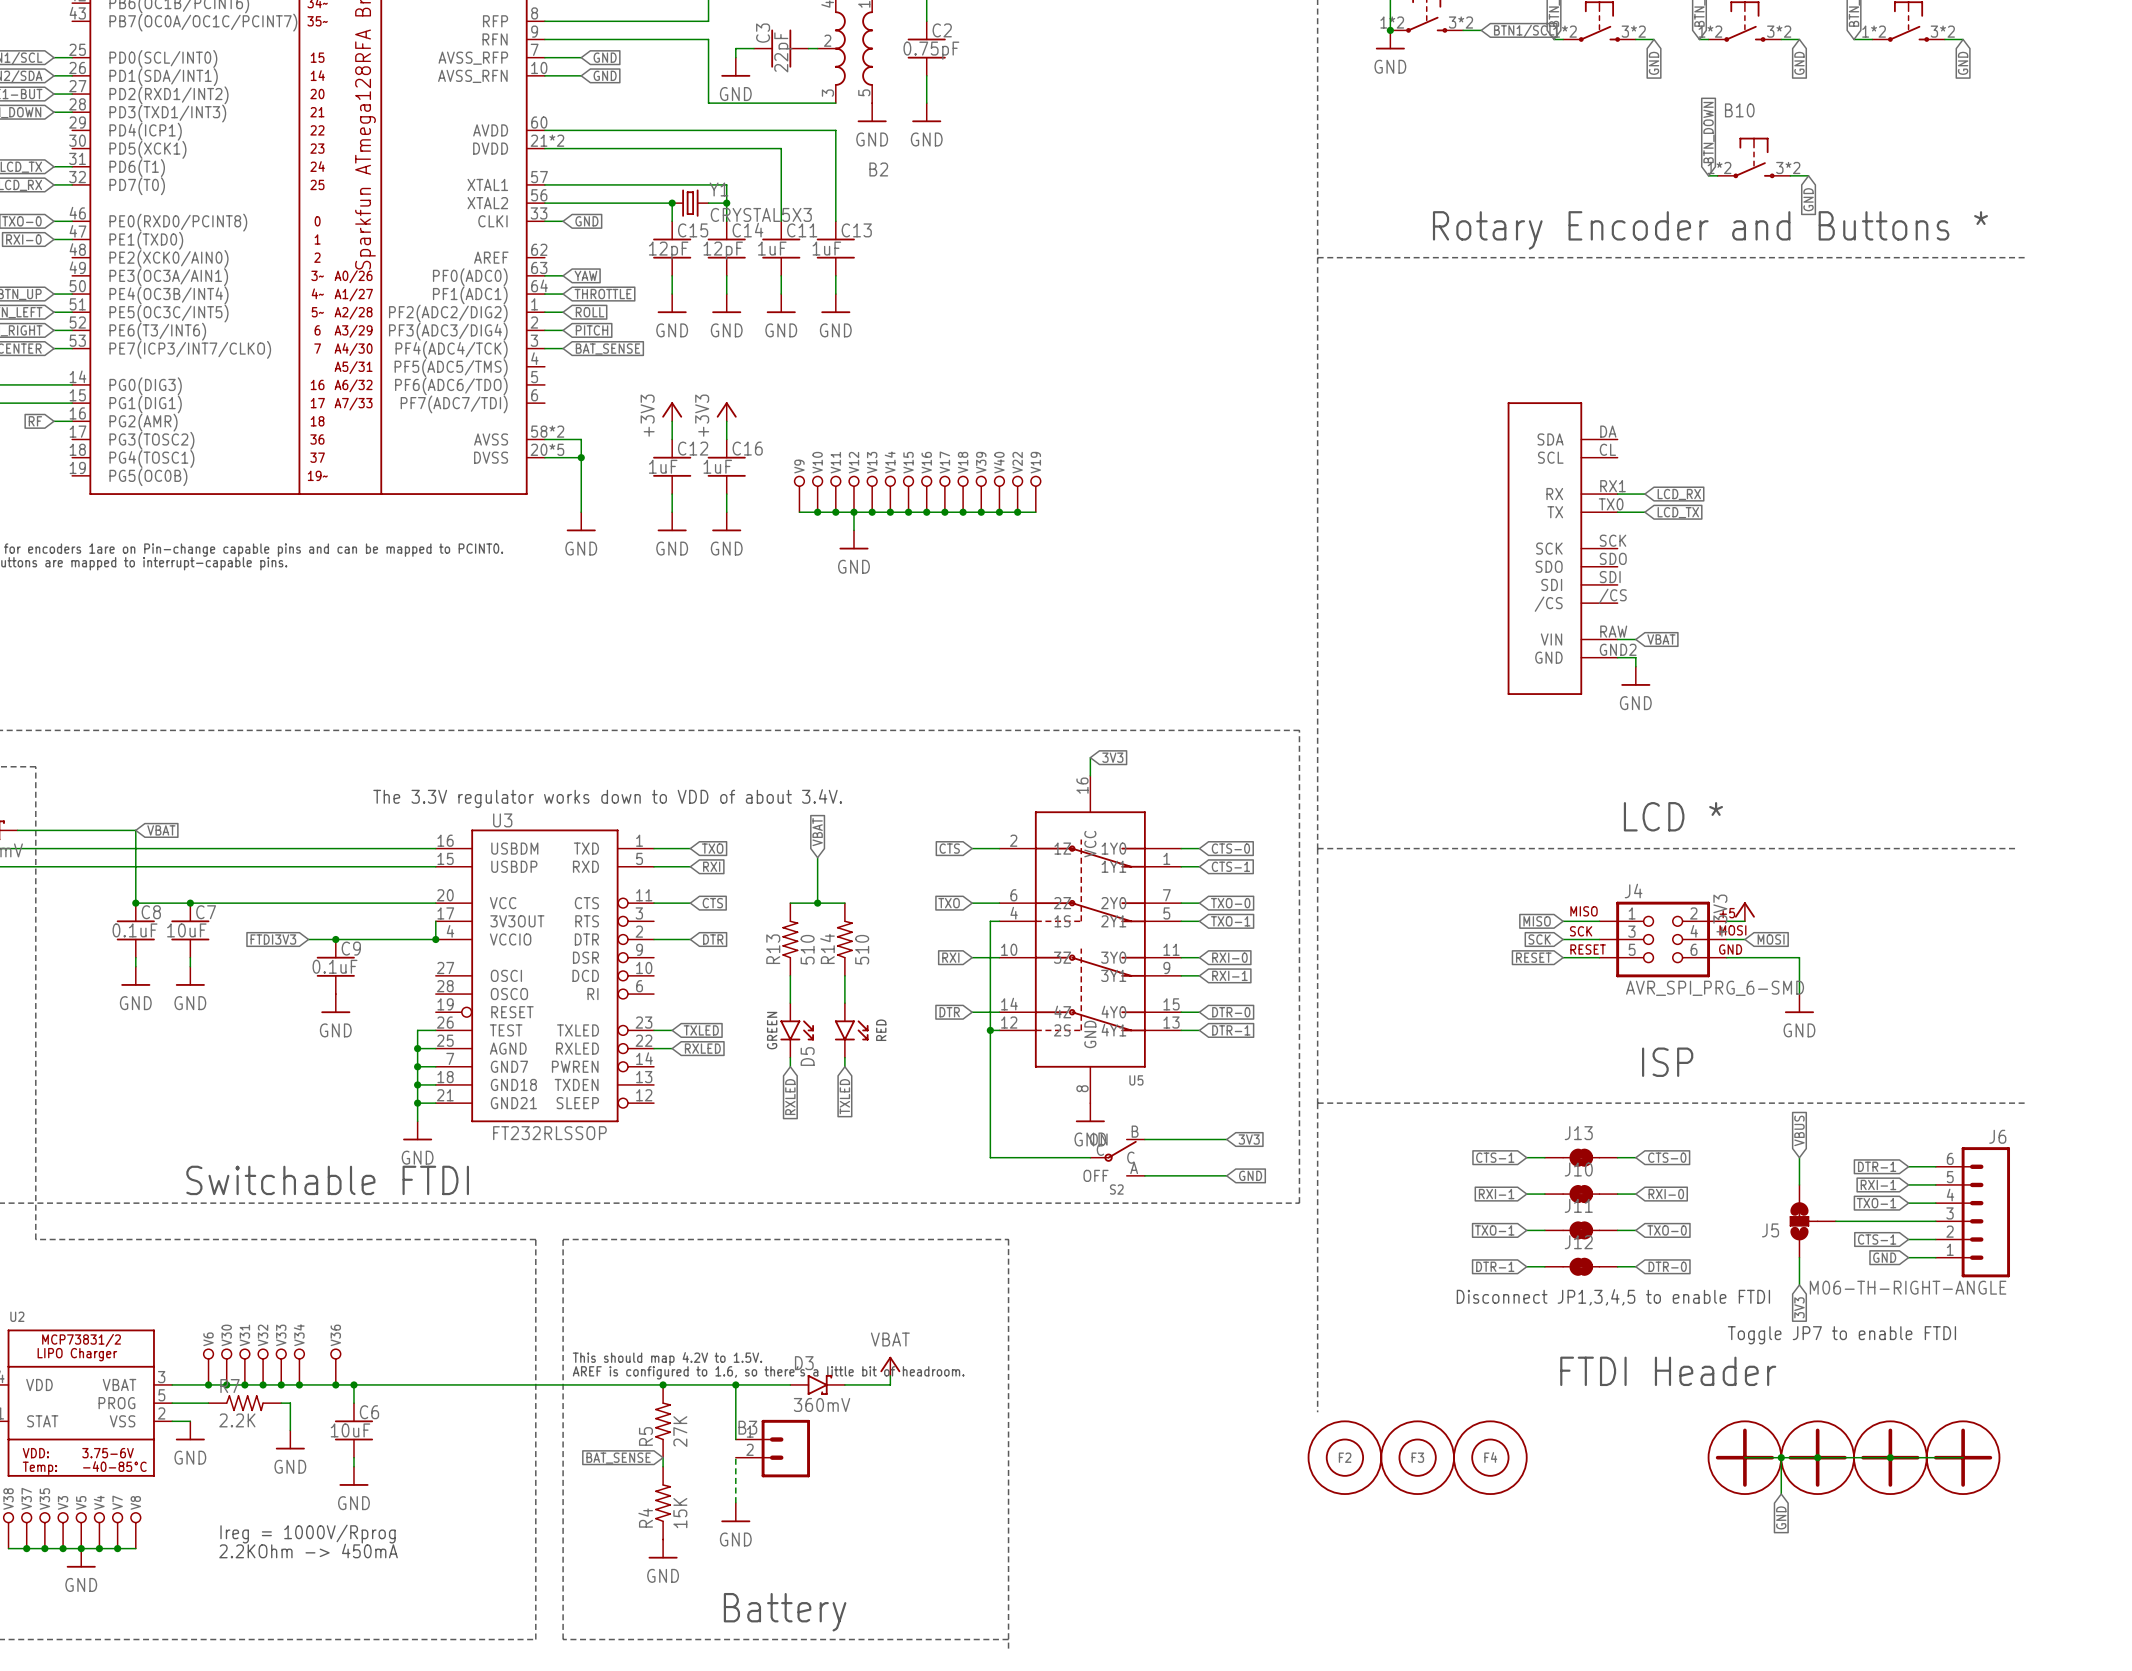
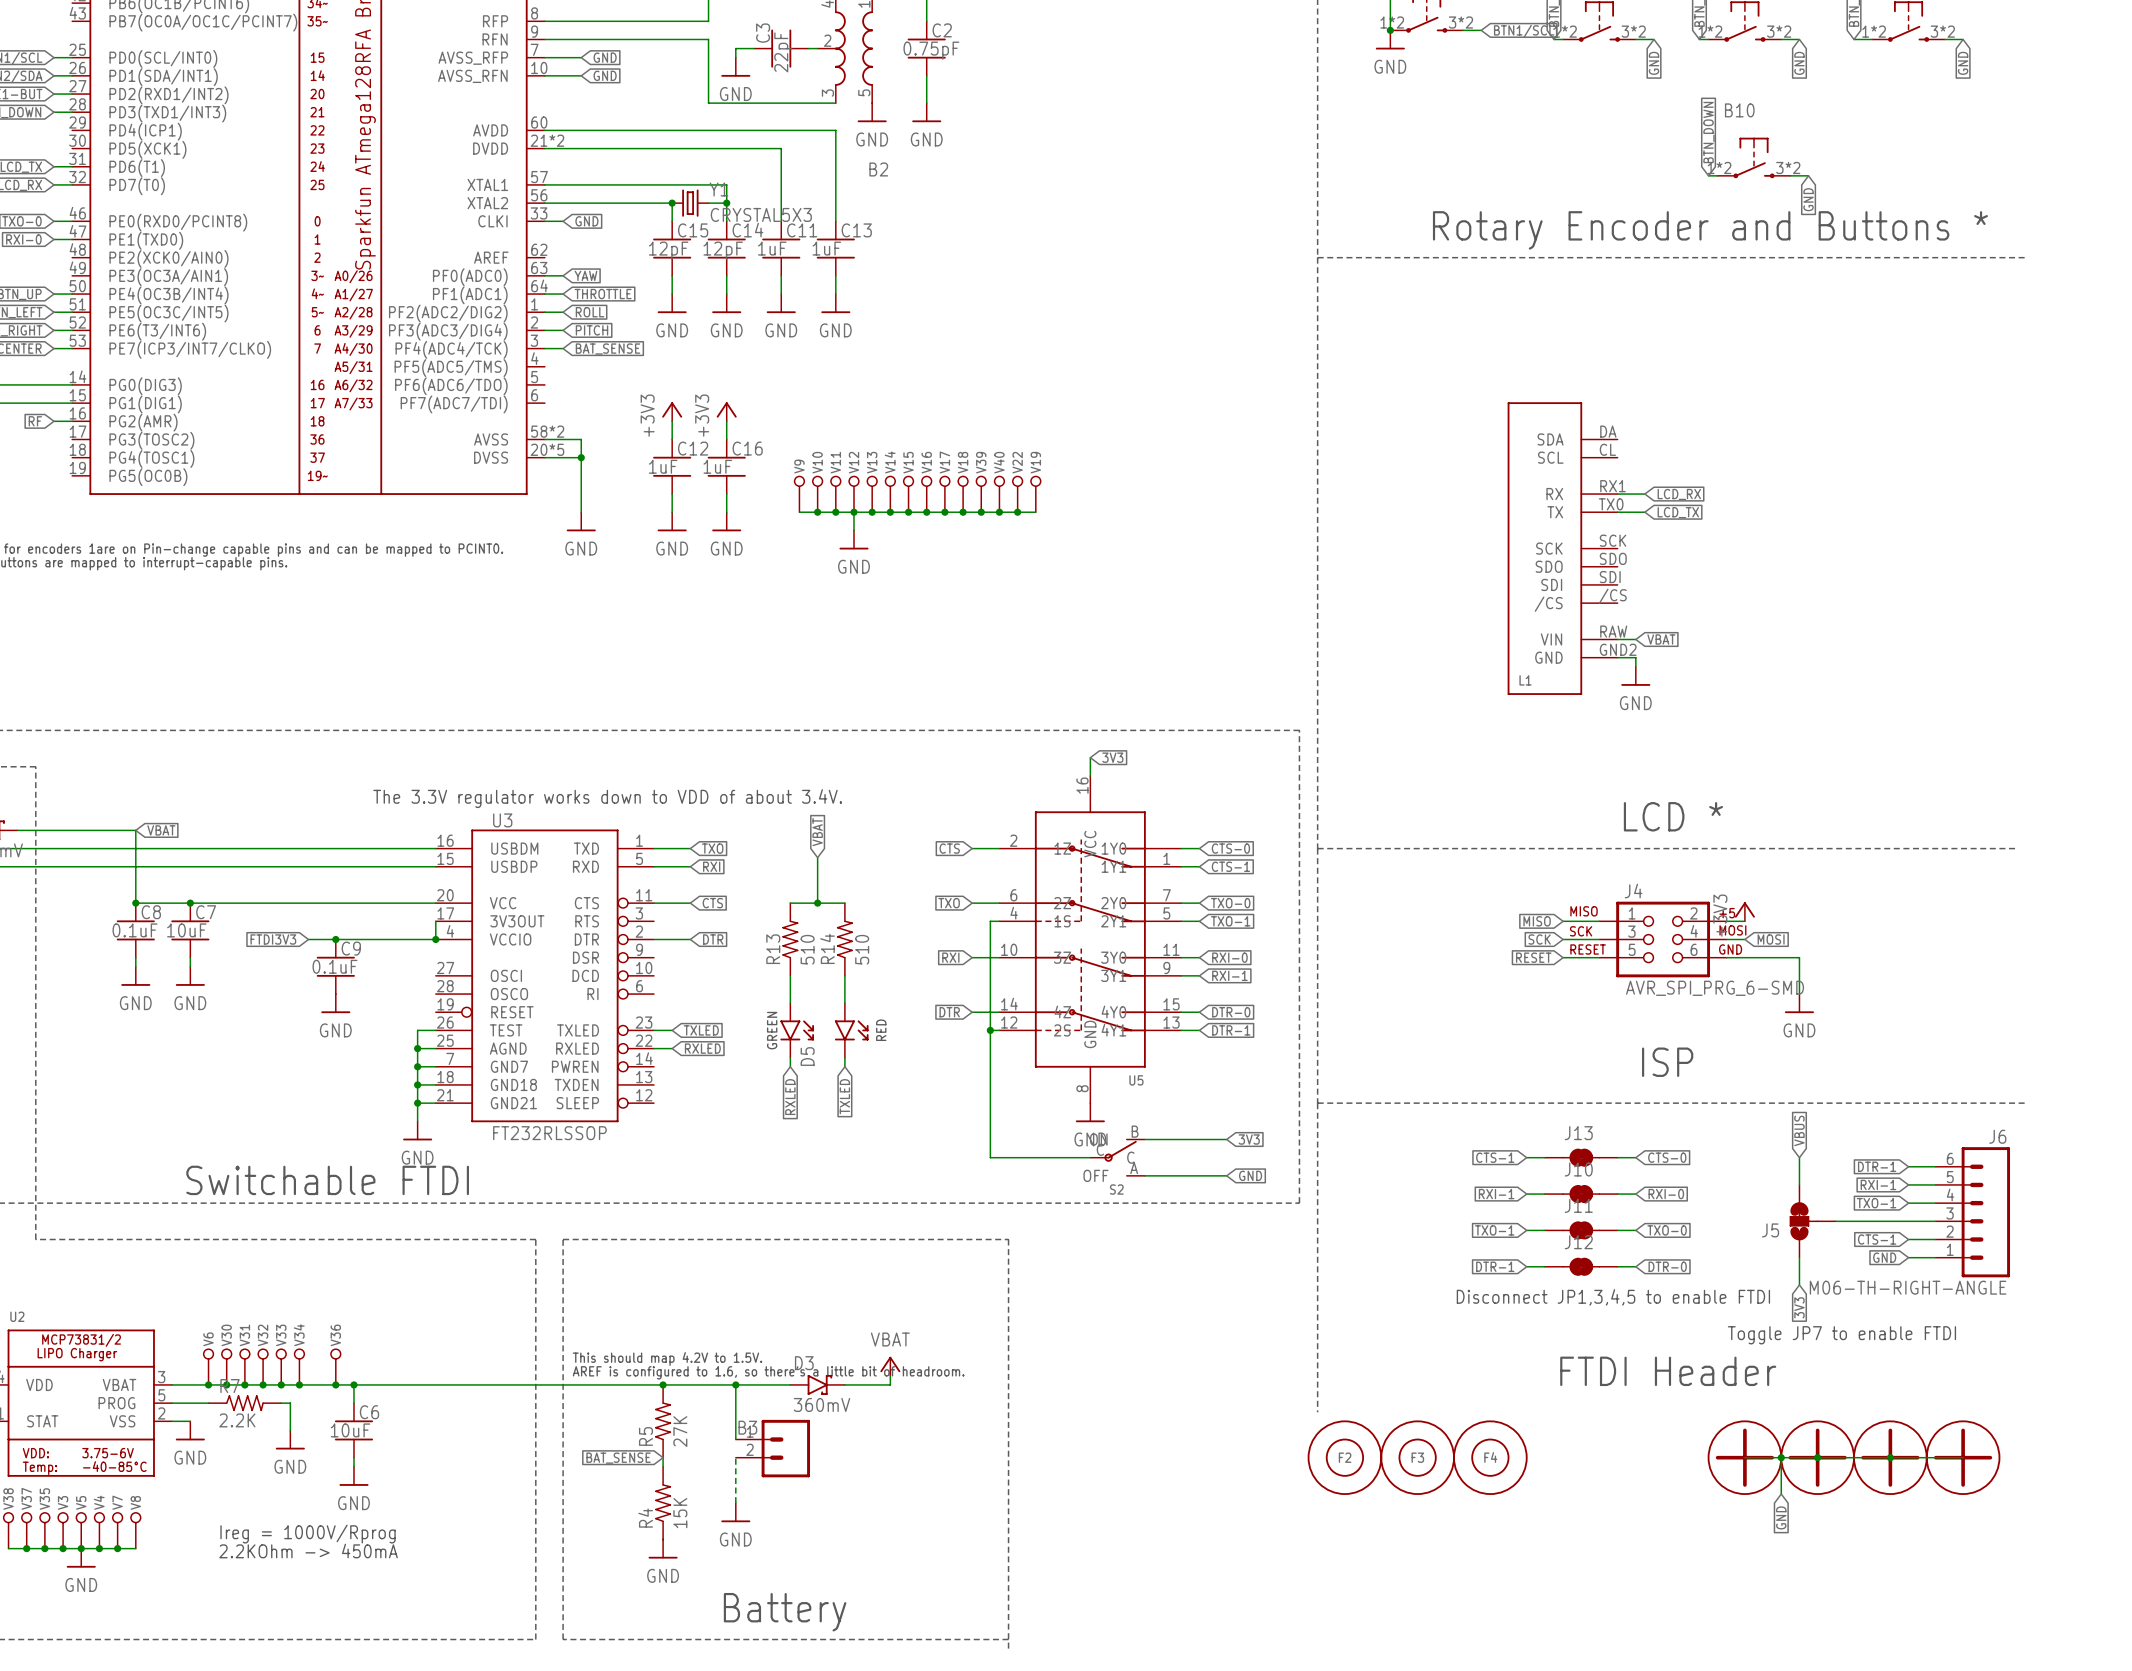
L1 name: none -> L1 (1525, 680)

